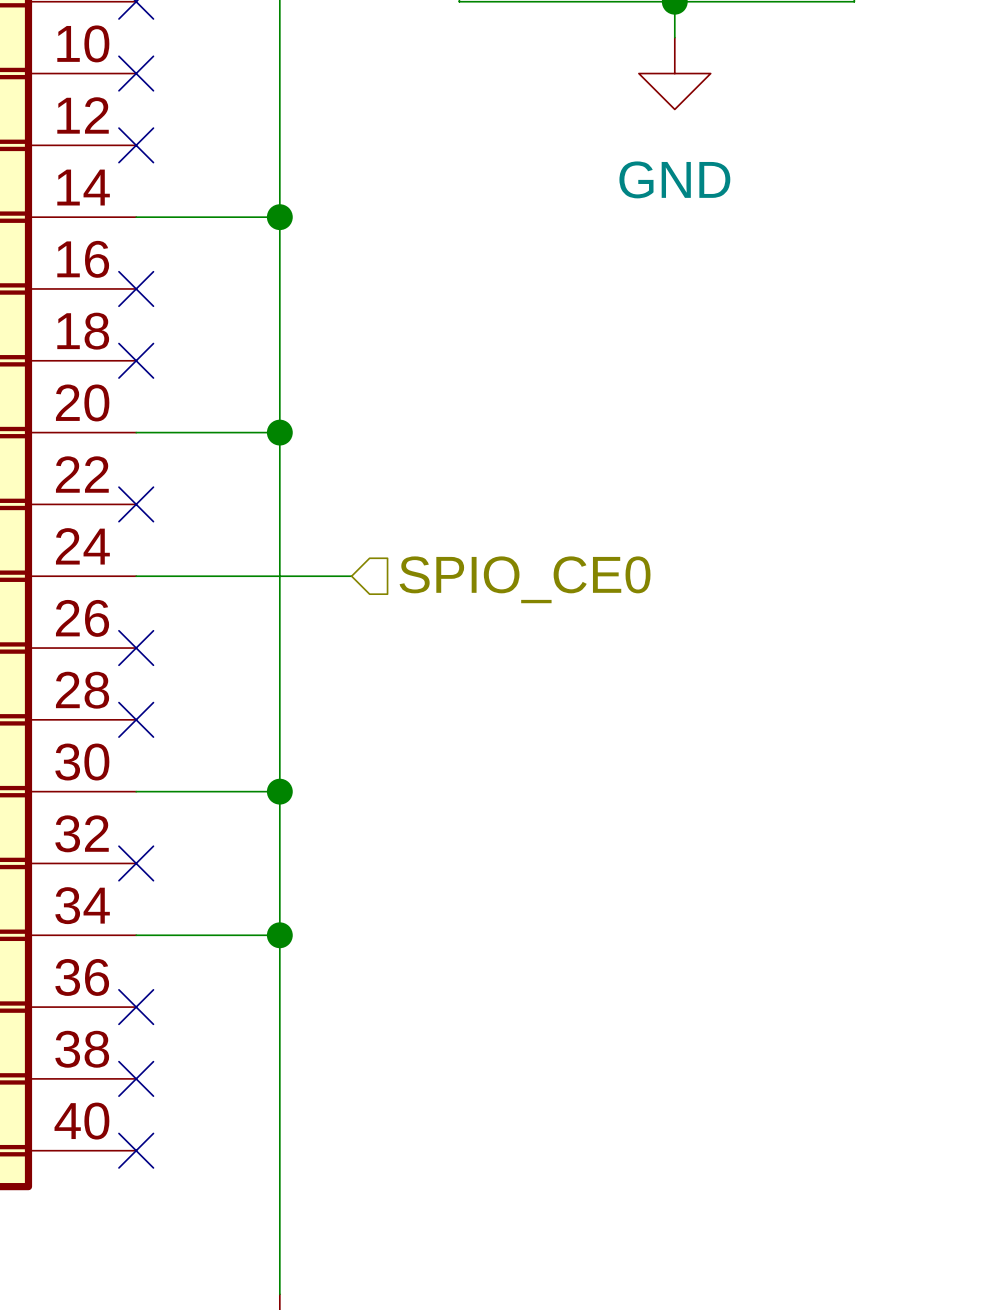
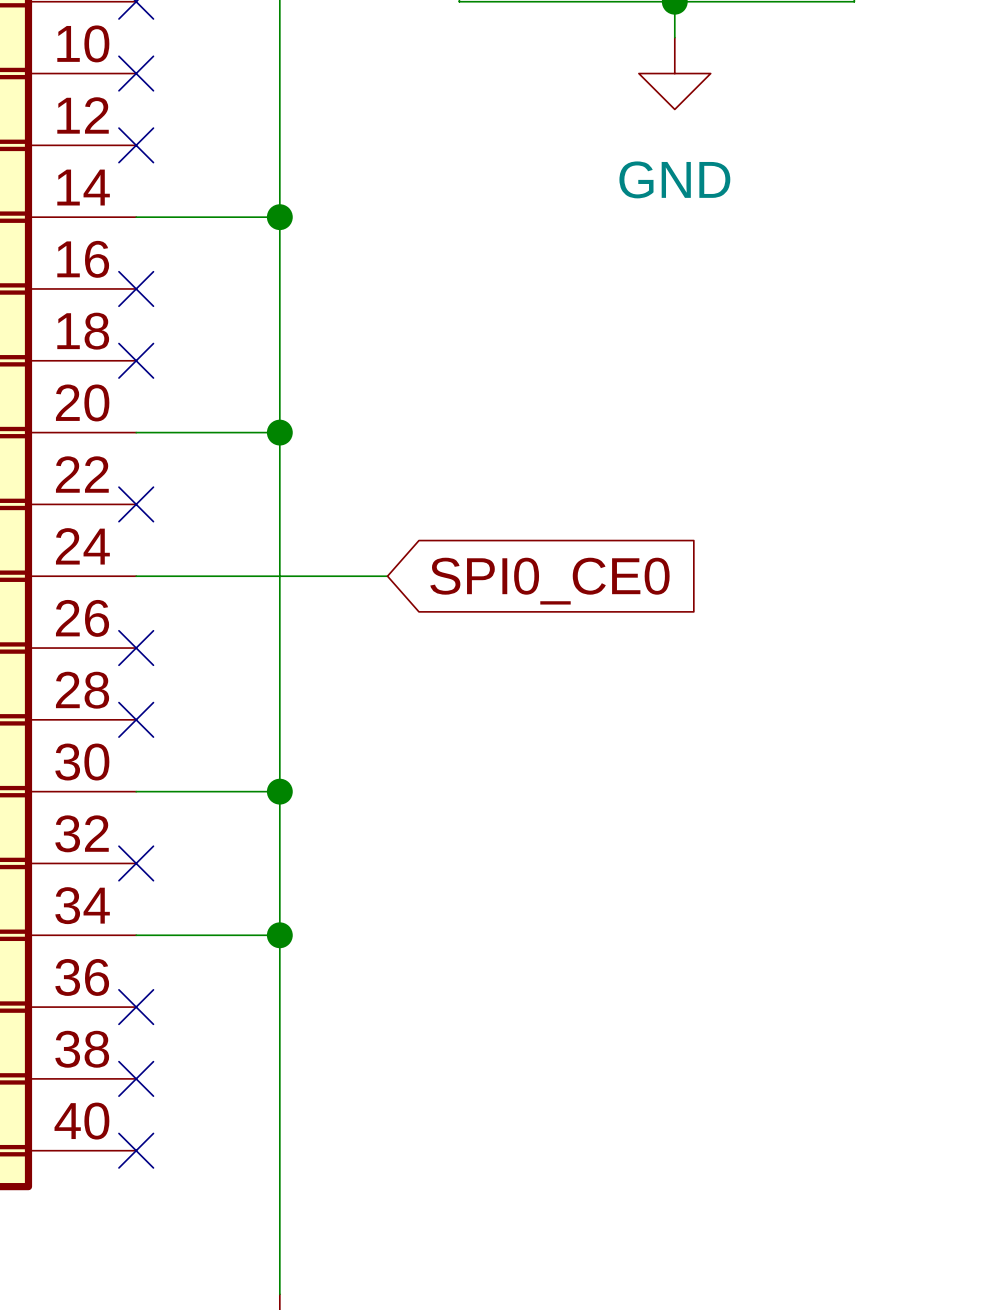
wire: none -> (351, 576) (387, 576)
hierarchical label: SPIO_CE0 (525, 579) -> none
global label: none -> SPI0_CE0 (549, 581)

